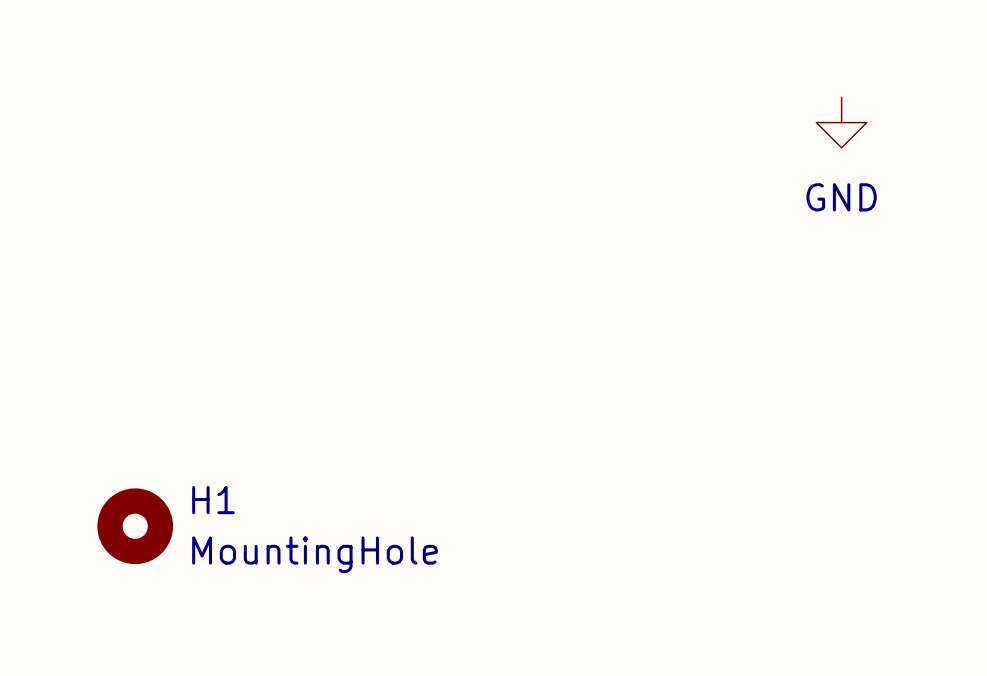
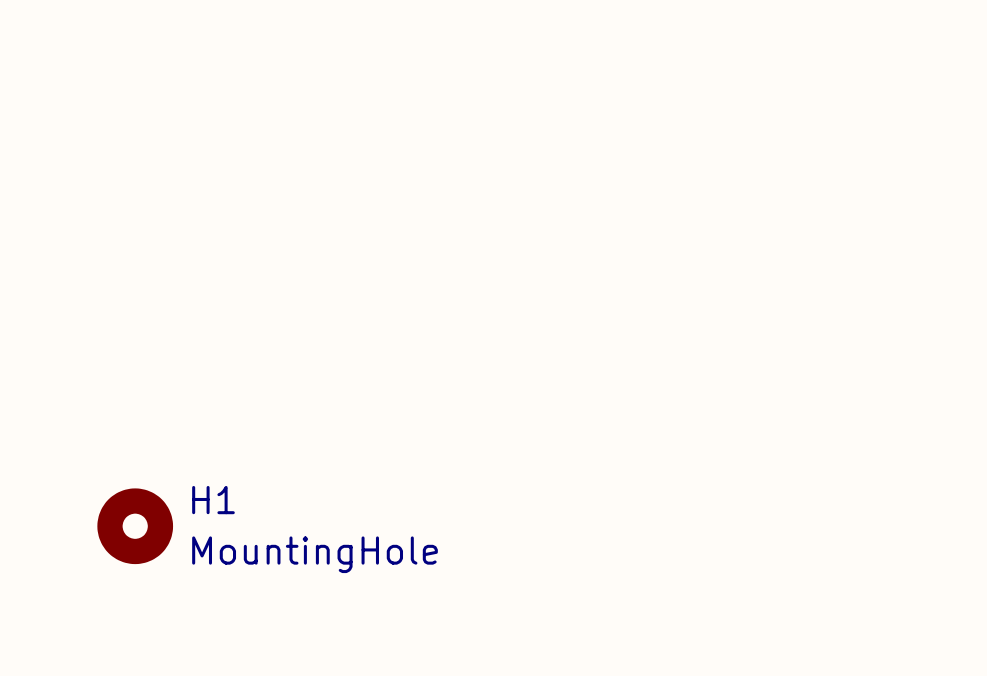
power symbol: GND (841, 122) -> none

